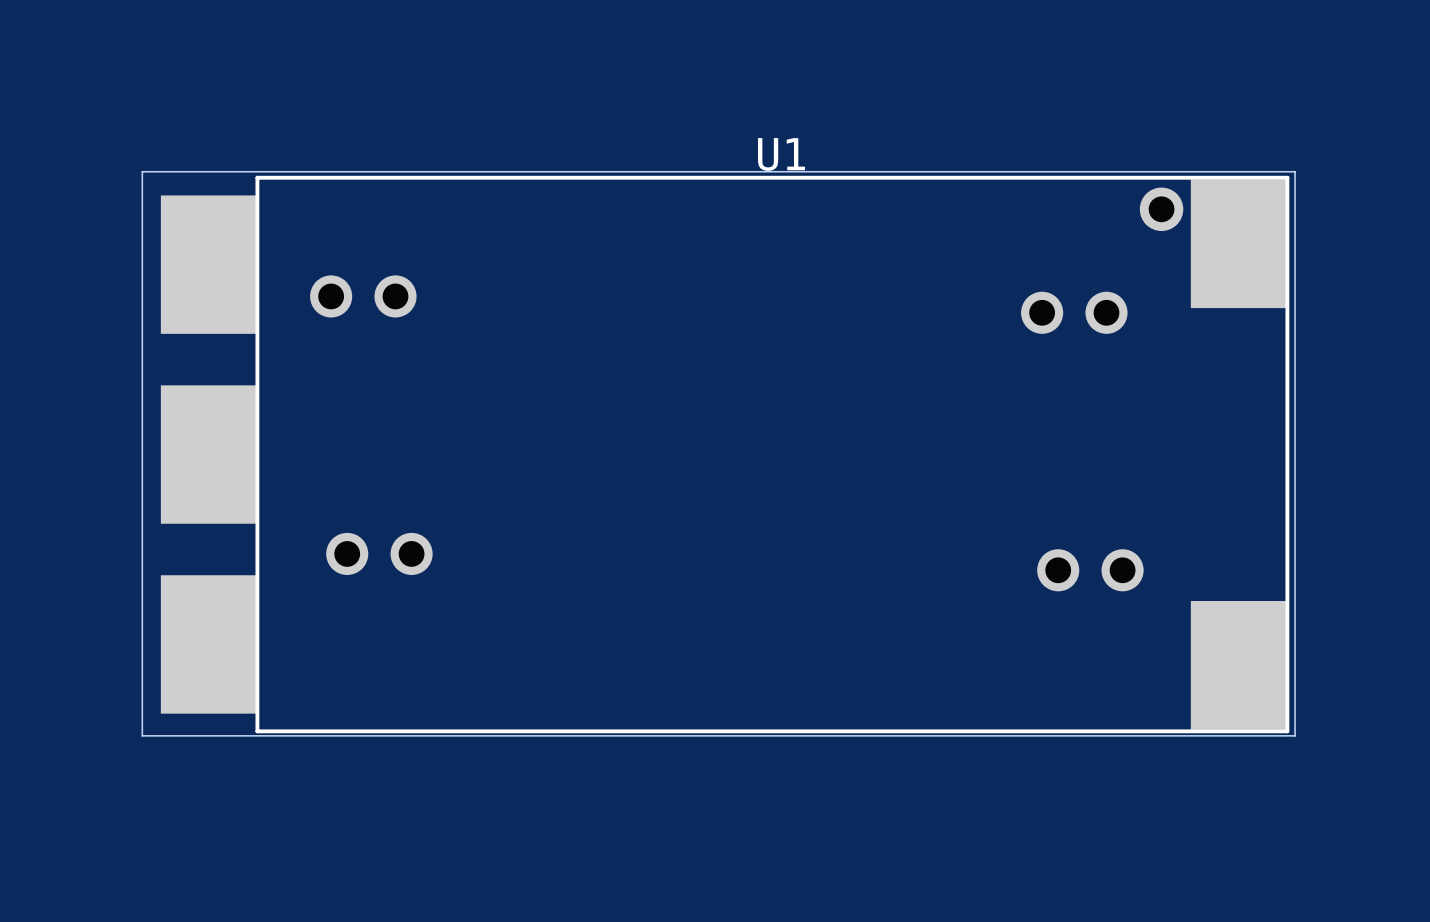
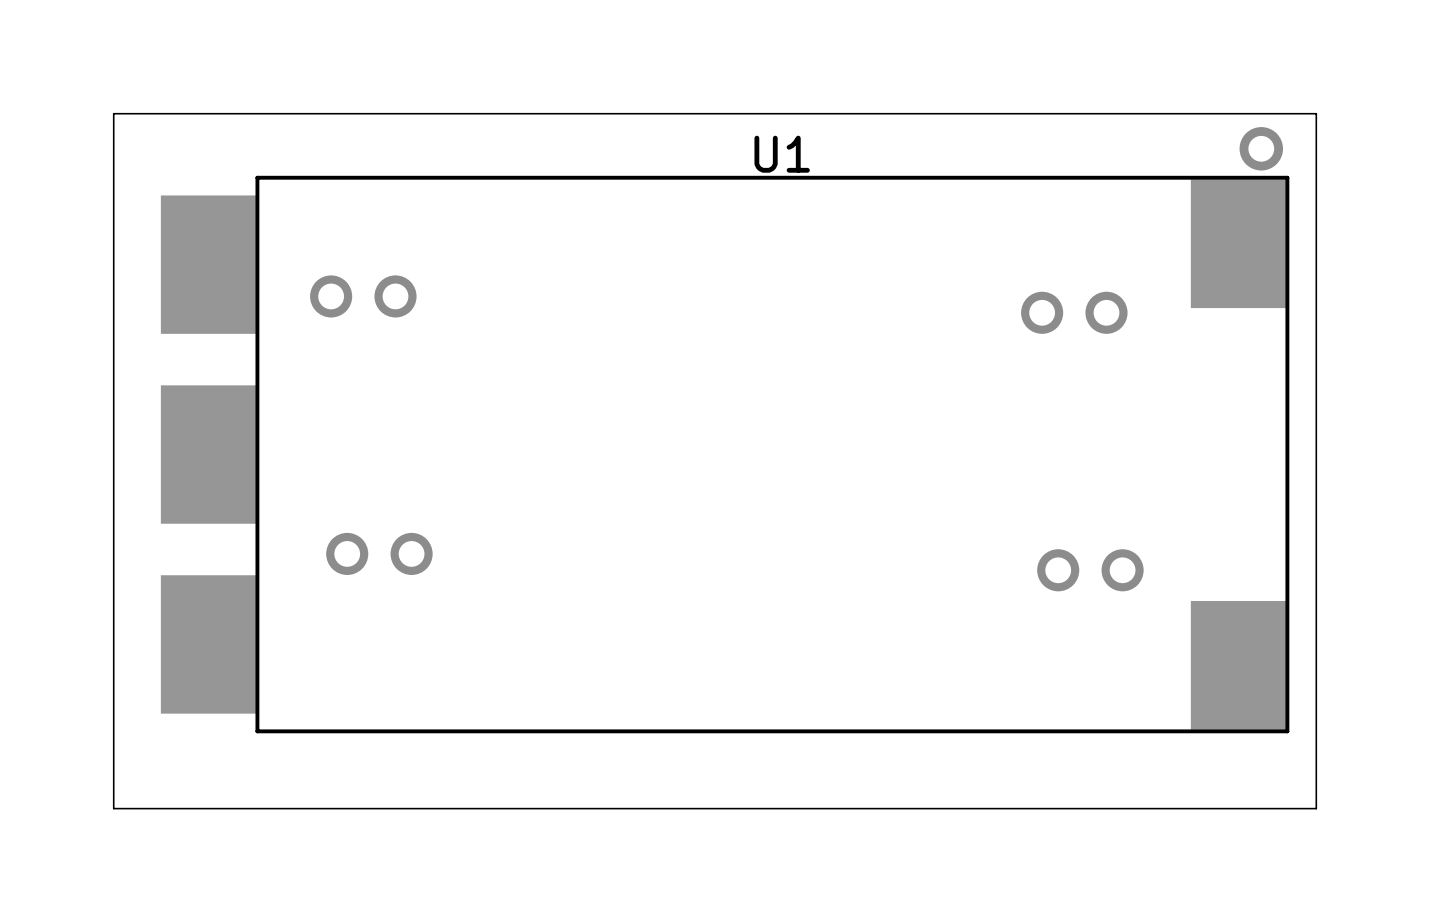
board edge: (142, 171) (1295, 171) (1295, 735) (142, 735) (142, 171) -> (113, 113) (113, 808) (1316, 808) (1316, 113) (113, 113)
U1 footprint: [160, 175, 1290, 734] -> [160, 127, 1290, 734]

